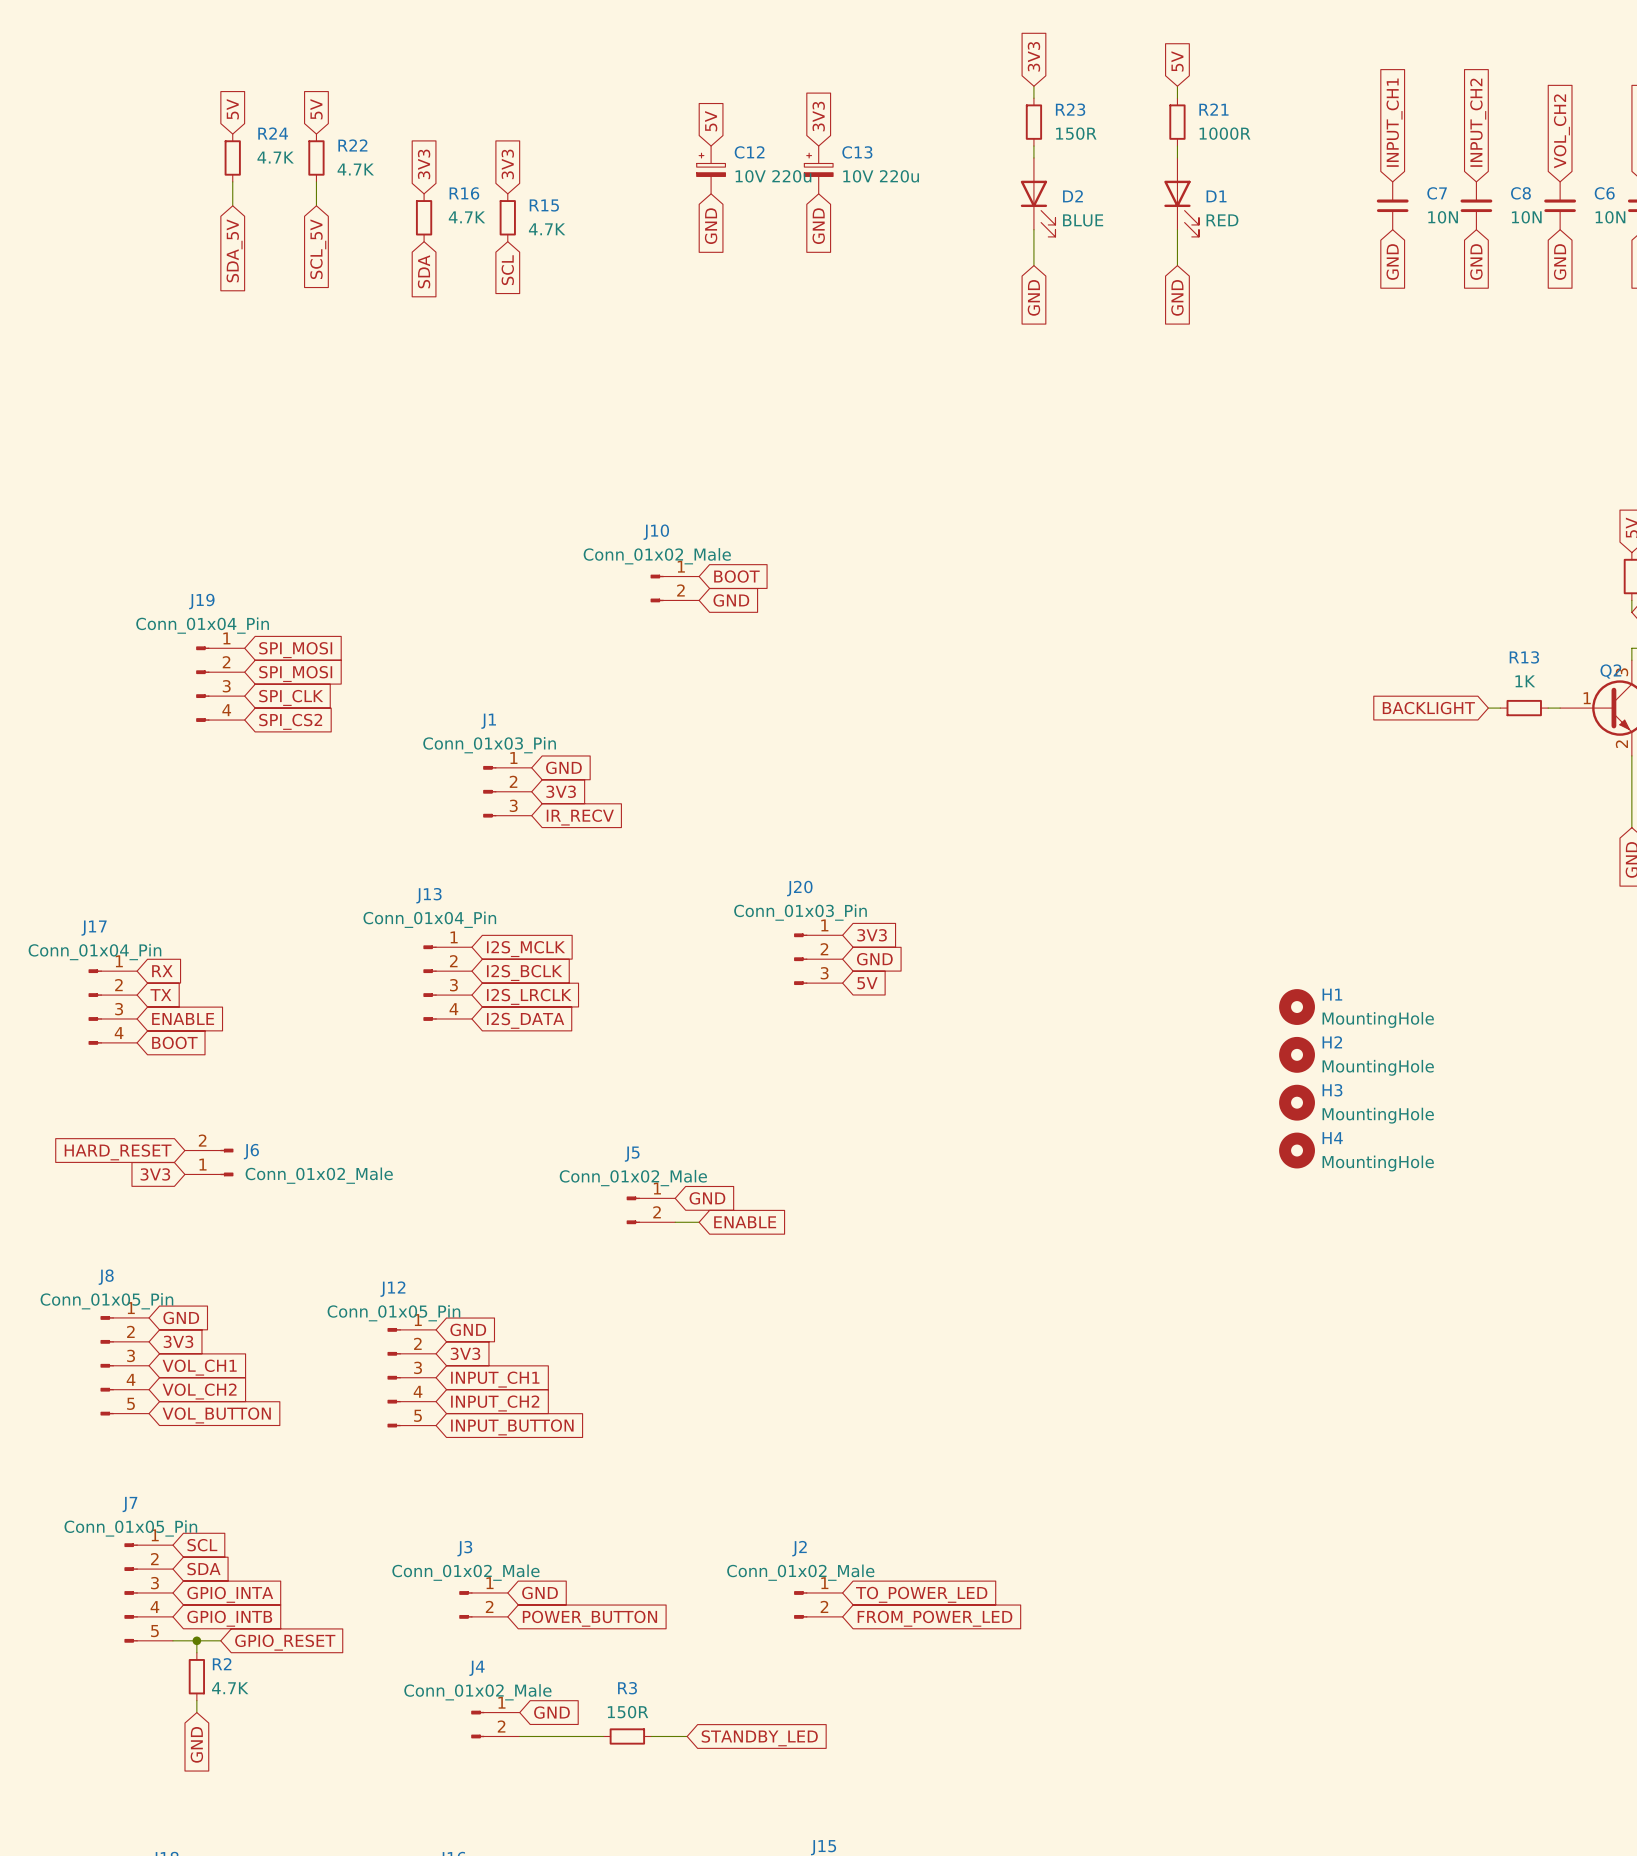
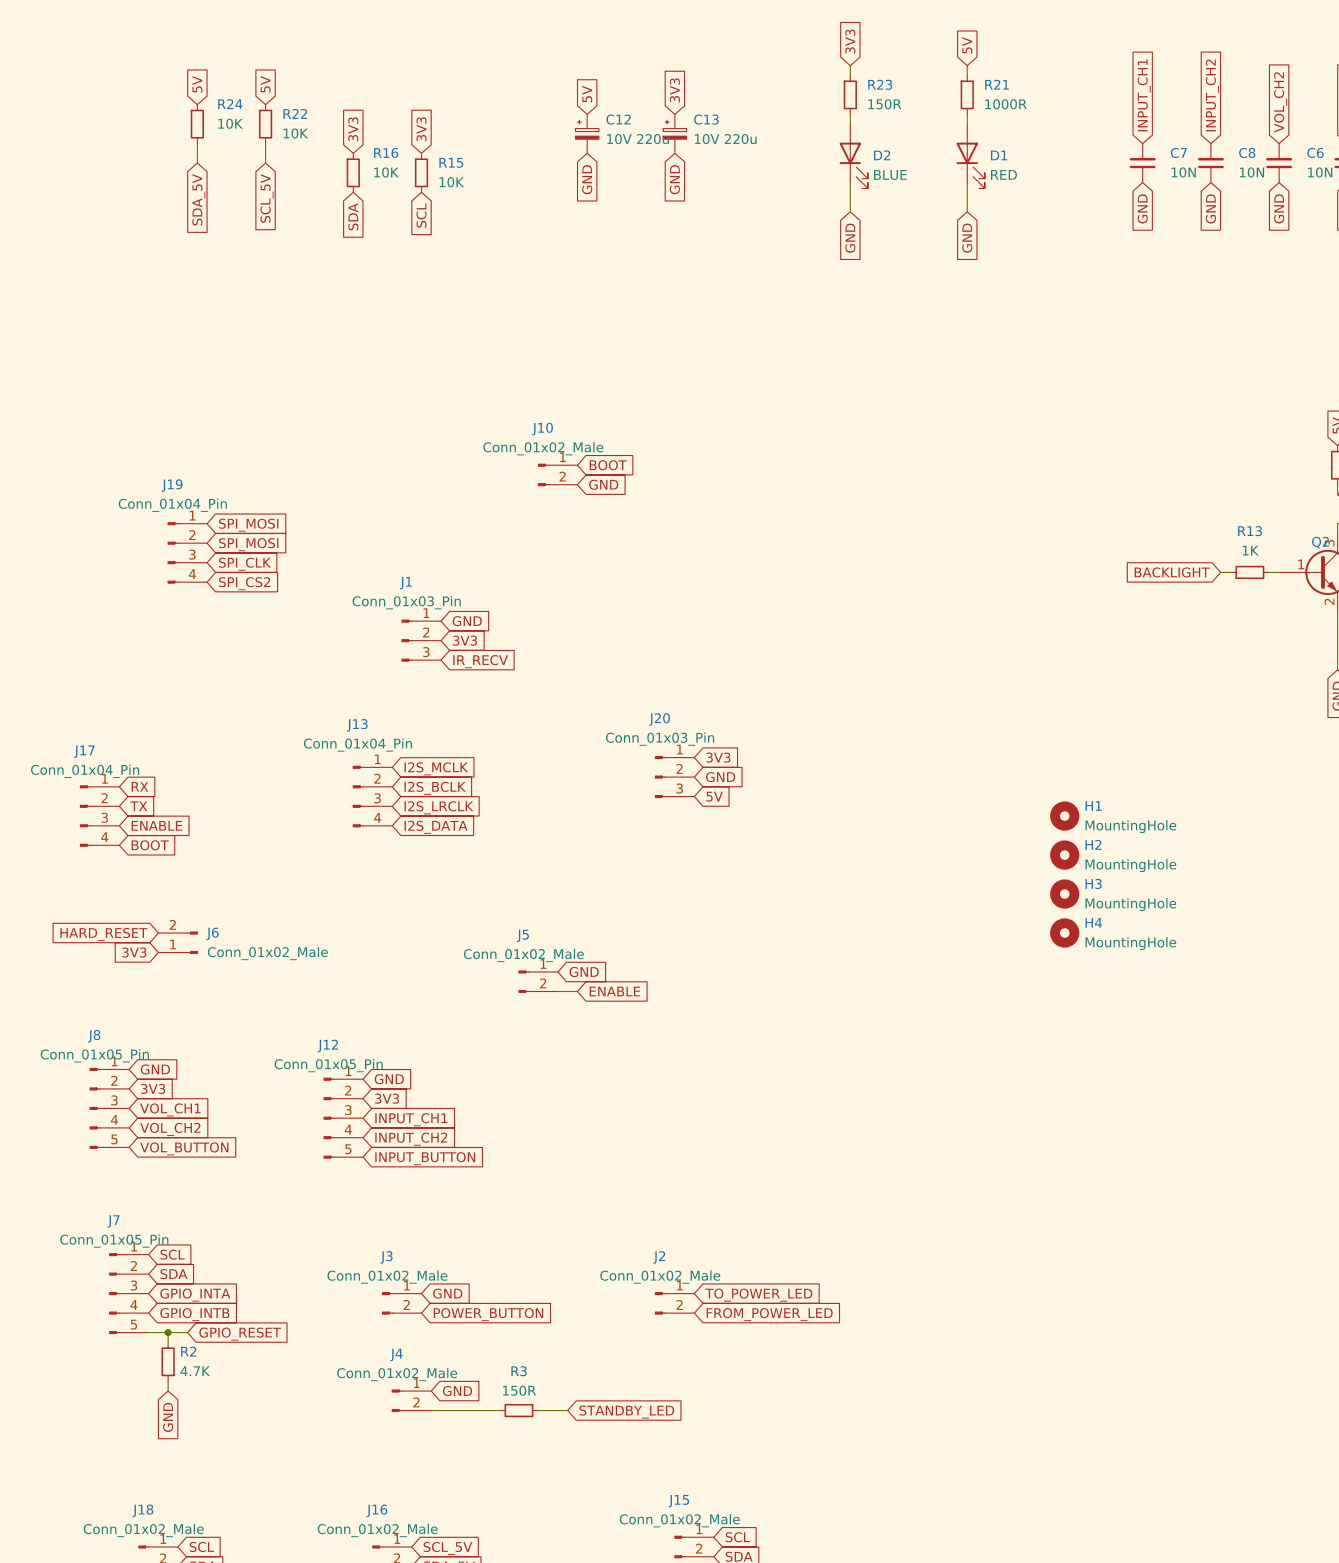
R24 value: 4.7K (275, 157) -> 10K (230, 123)
R22 value: 4.7K (355, 169) -> 10K (295, 133)
R16 value: 4.7K (466, 217) -> 10K (386, 172)
R15 value: 4.7K (547, 229) -> 10K (451, 182)

